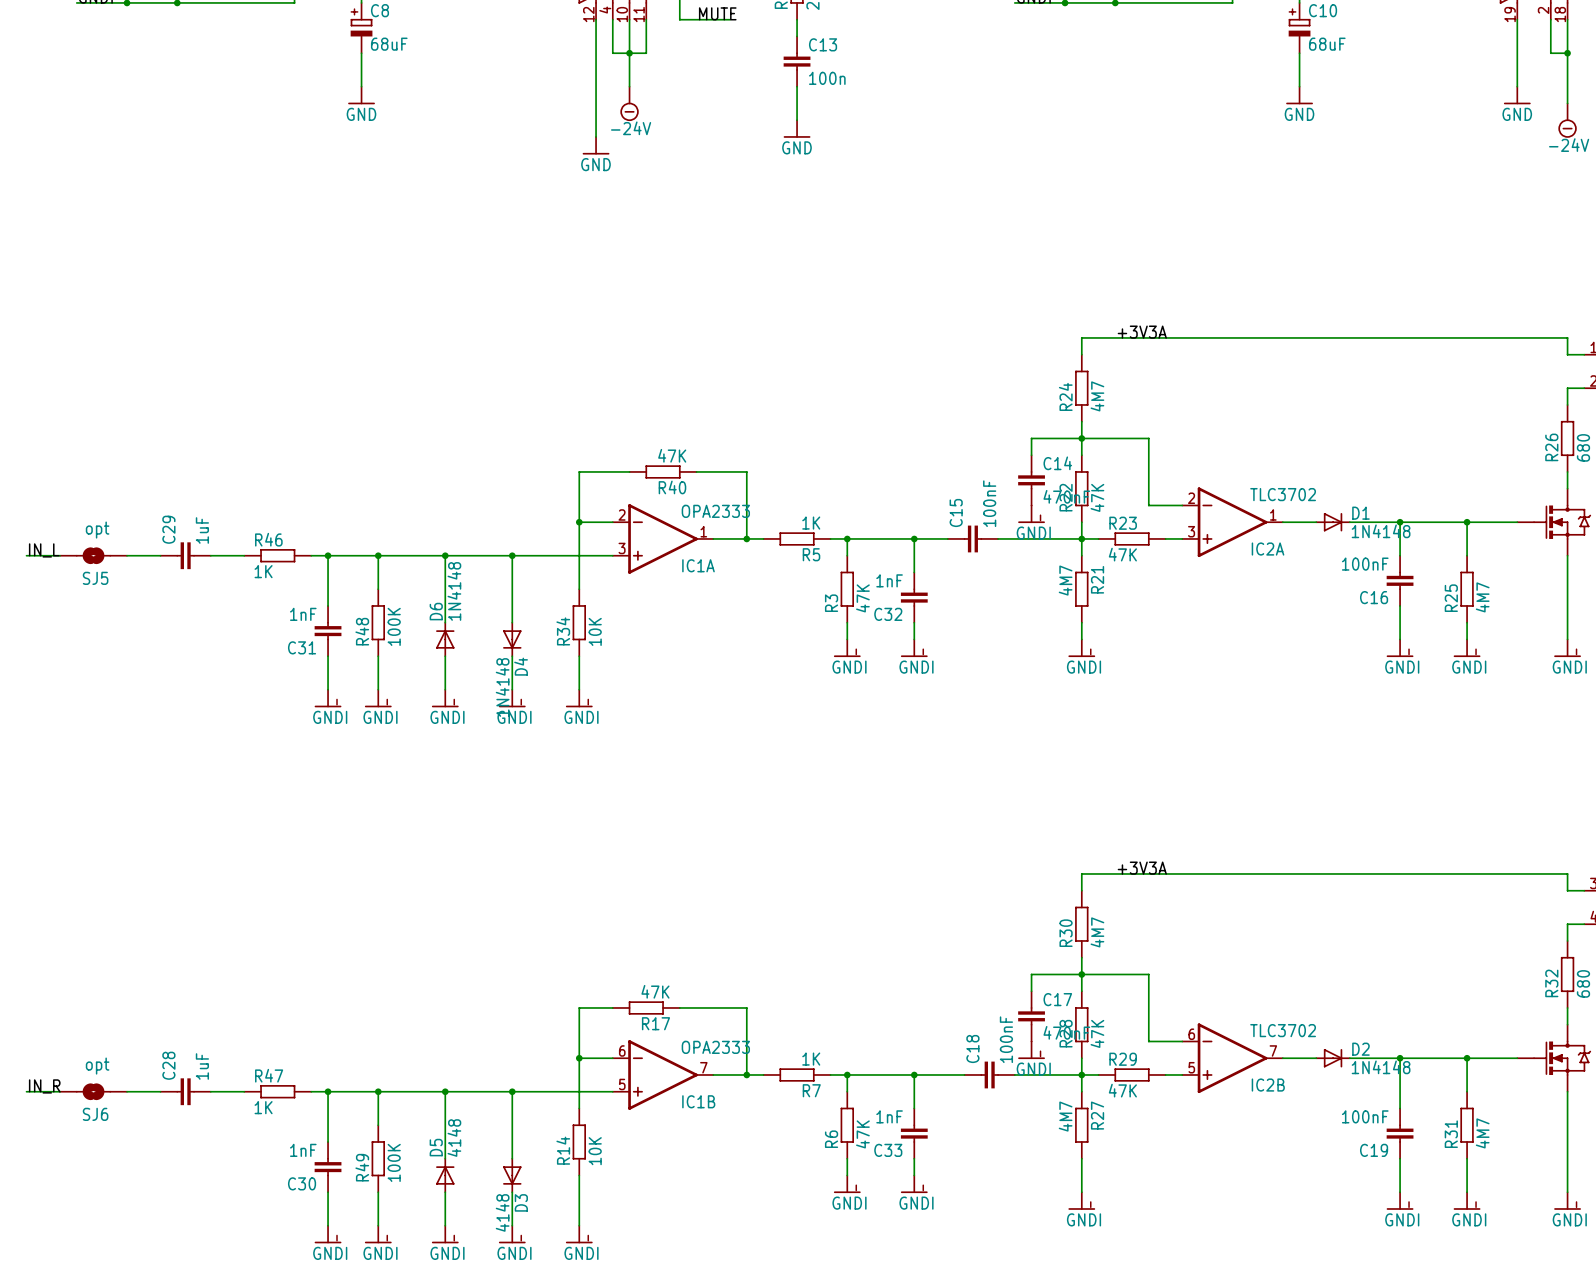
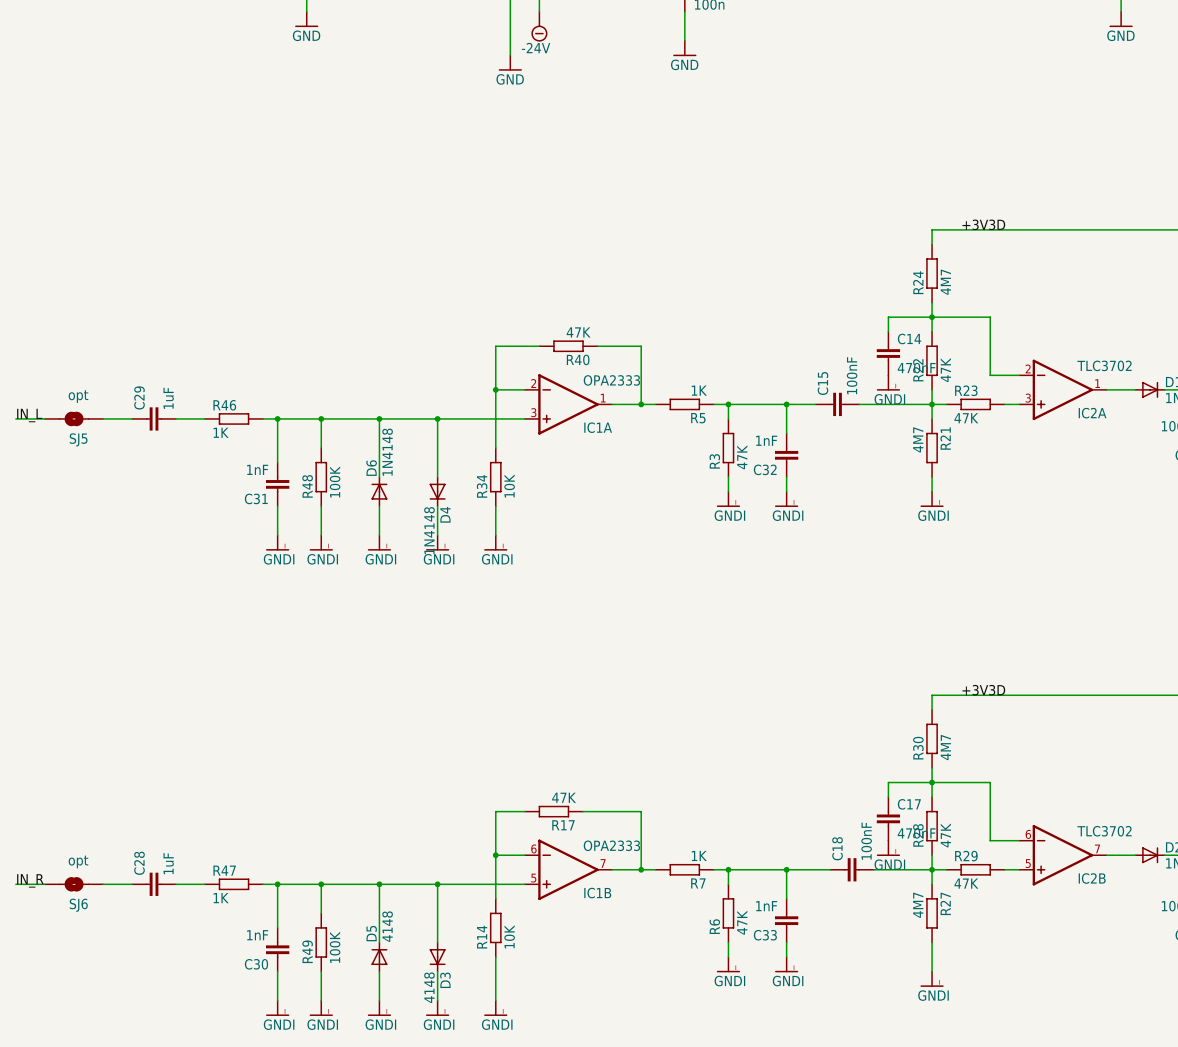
label: +3V3A (1142, 332) -> +3V3D (983, 224)
label: +3V3A (1142, 868) -> +3V3D (983, 690)

